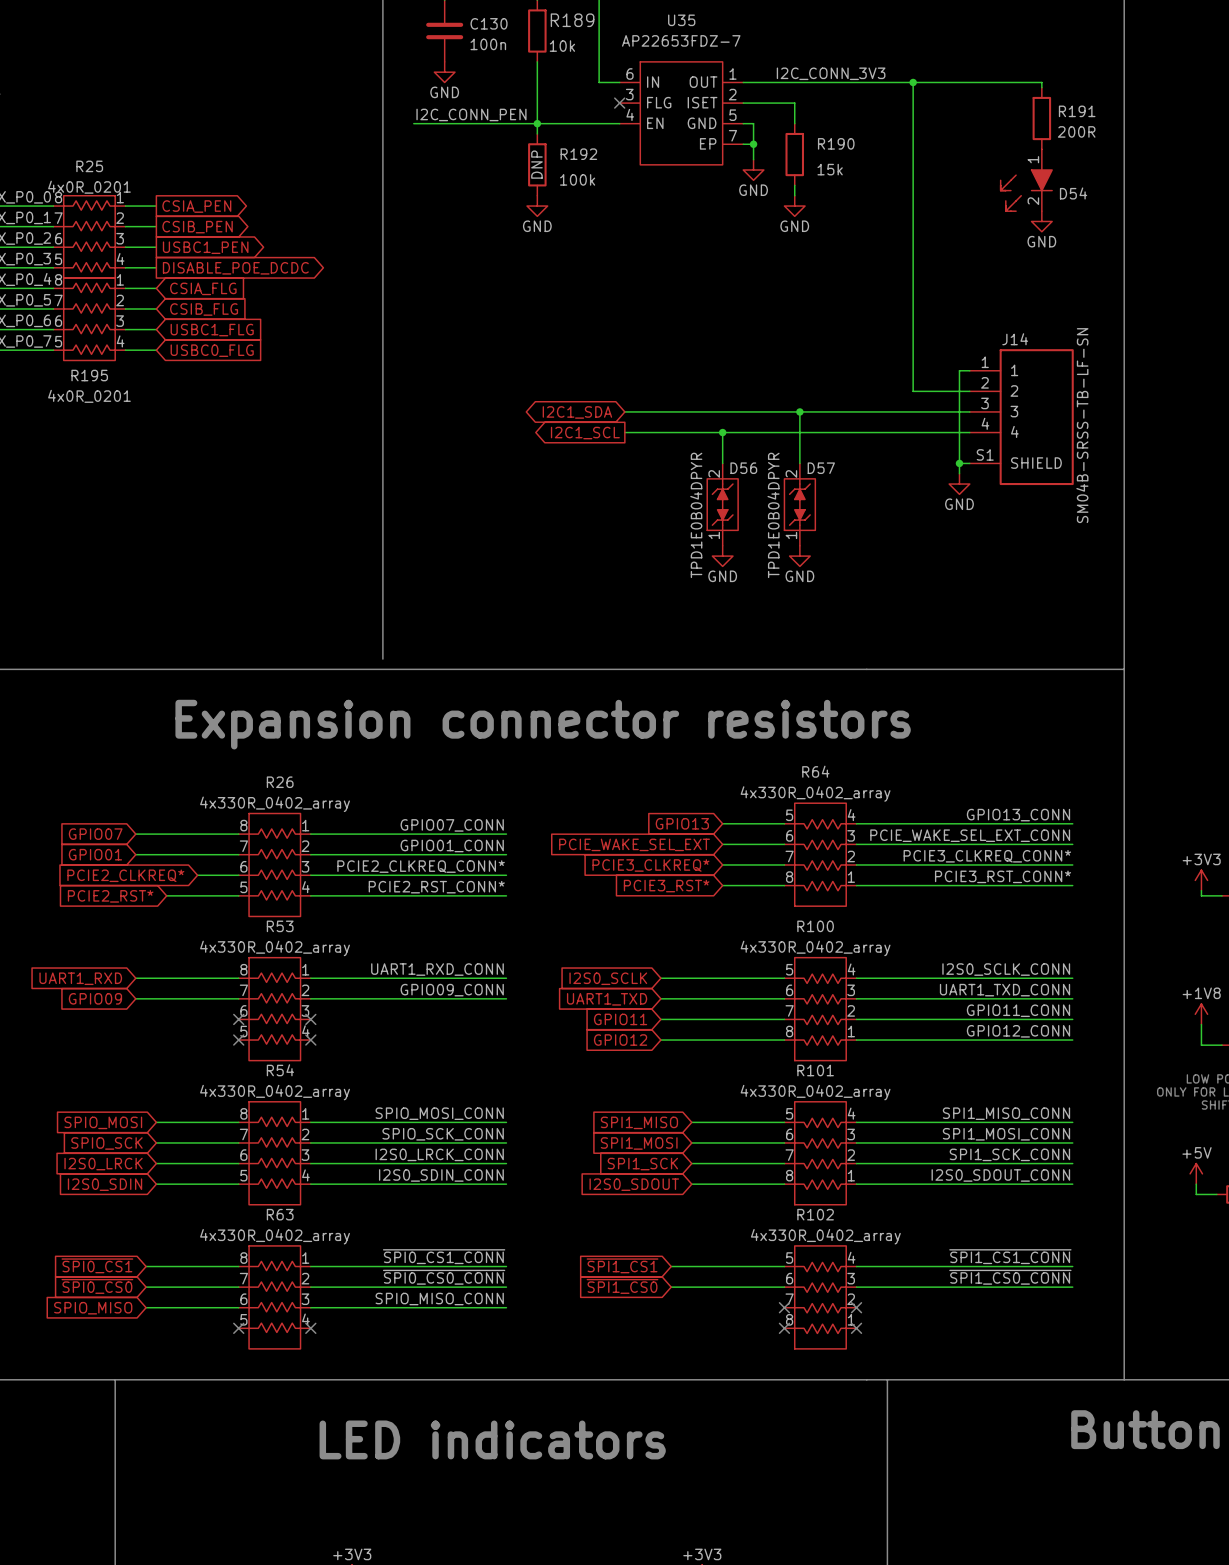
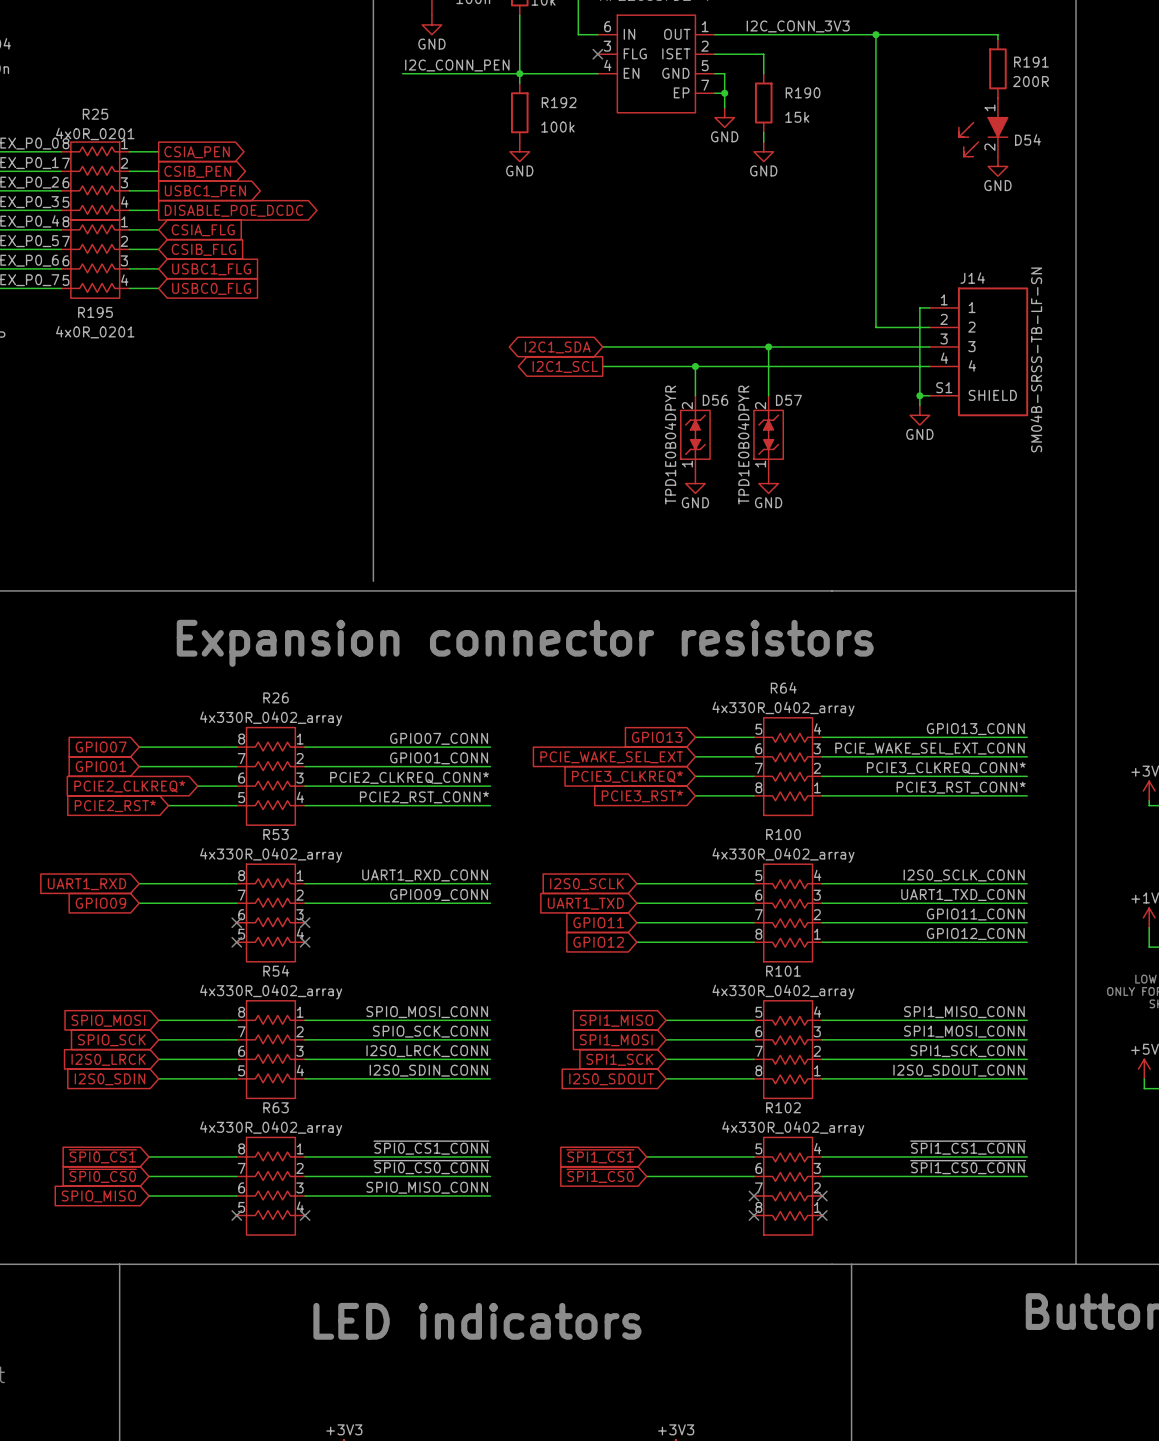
R192 text: DNP (536, 164) -> none

